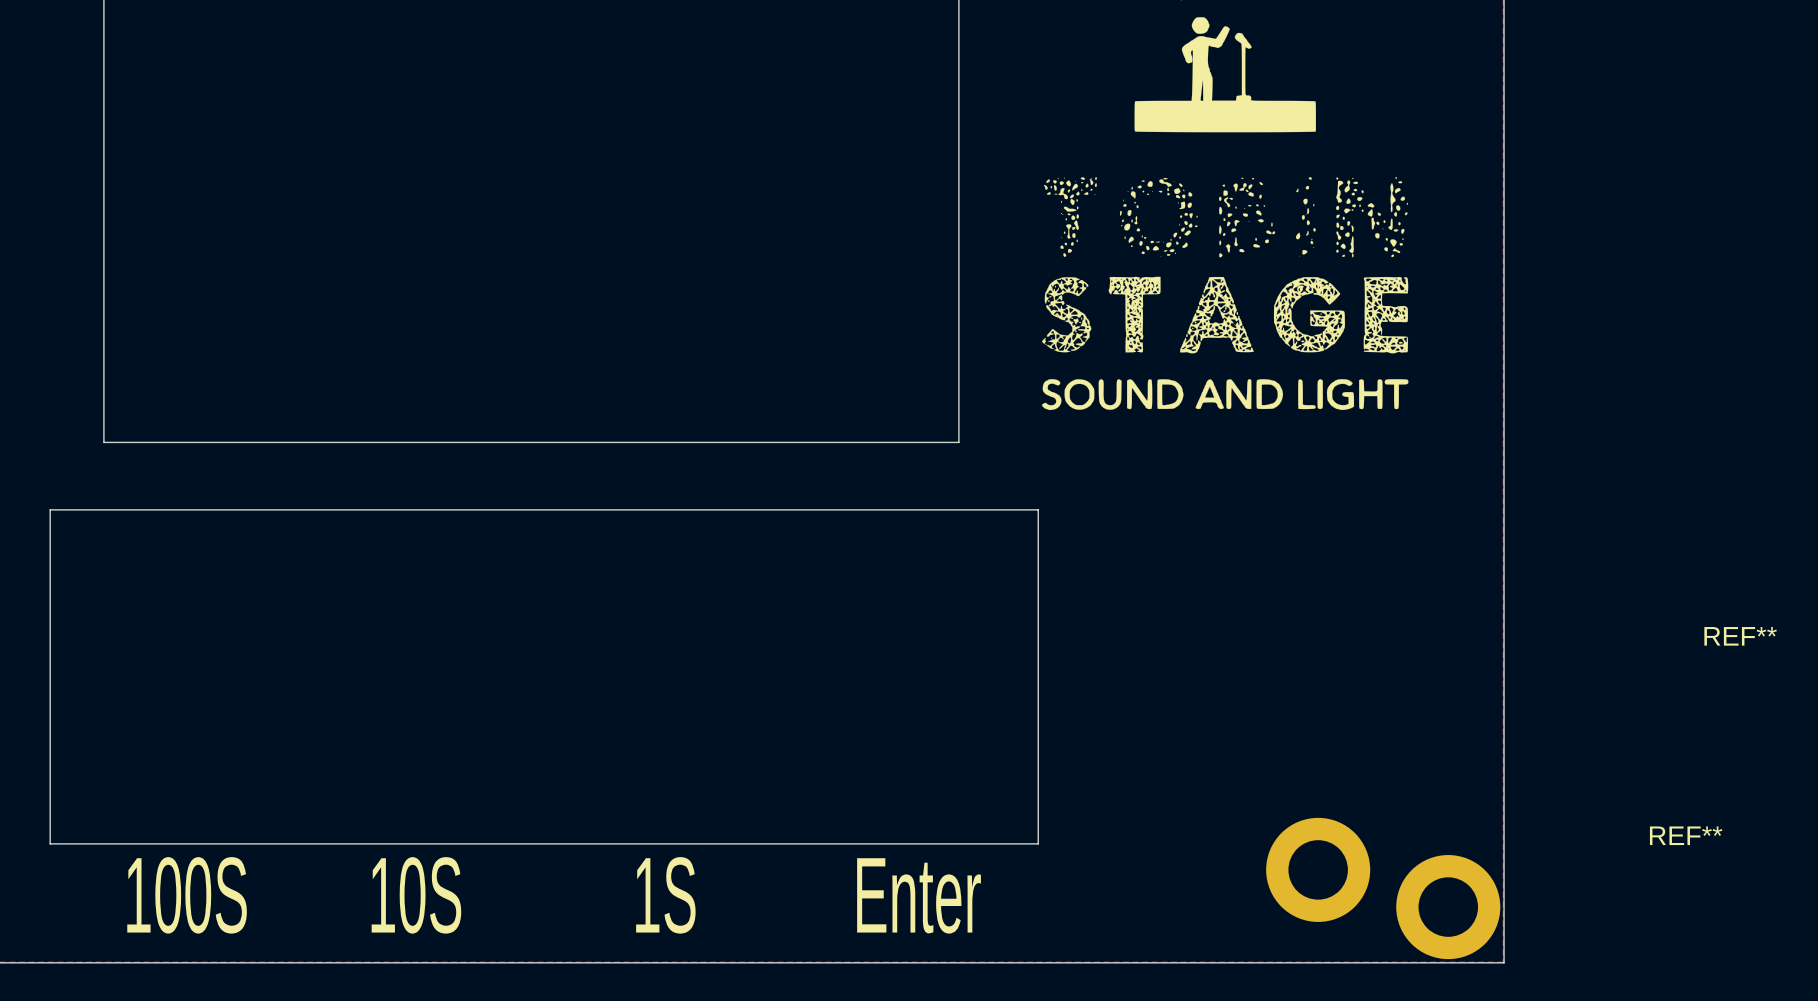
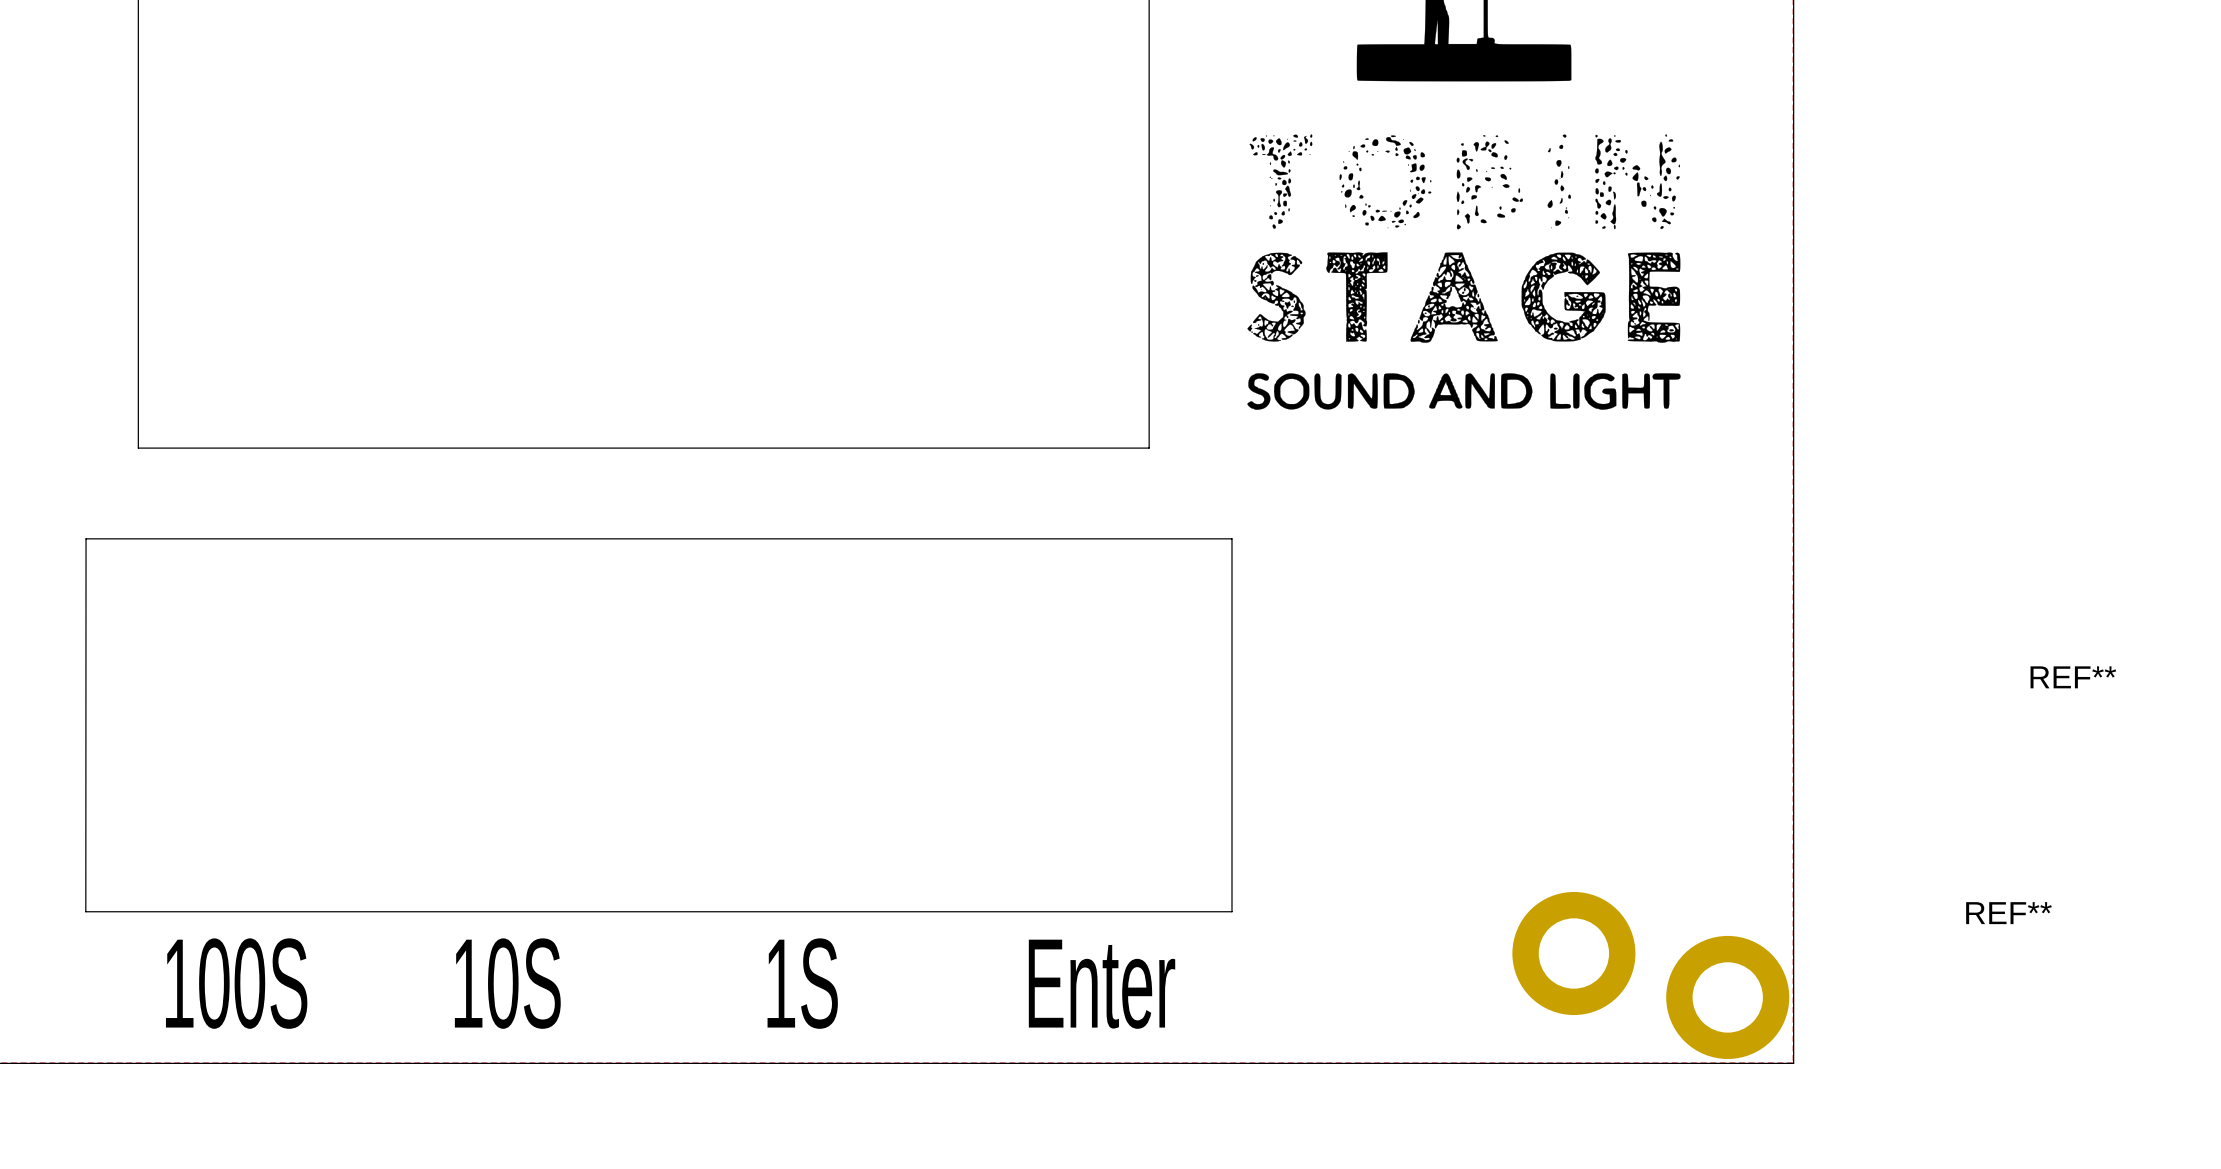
board edge: (50, 509) (50, 843) (1038, 843) (1038, 509) (50, 509) -> (86, 538) (85, 911) (1231, 911) (1231, 538) (86, 538)

